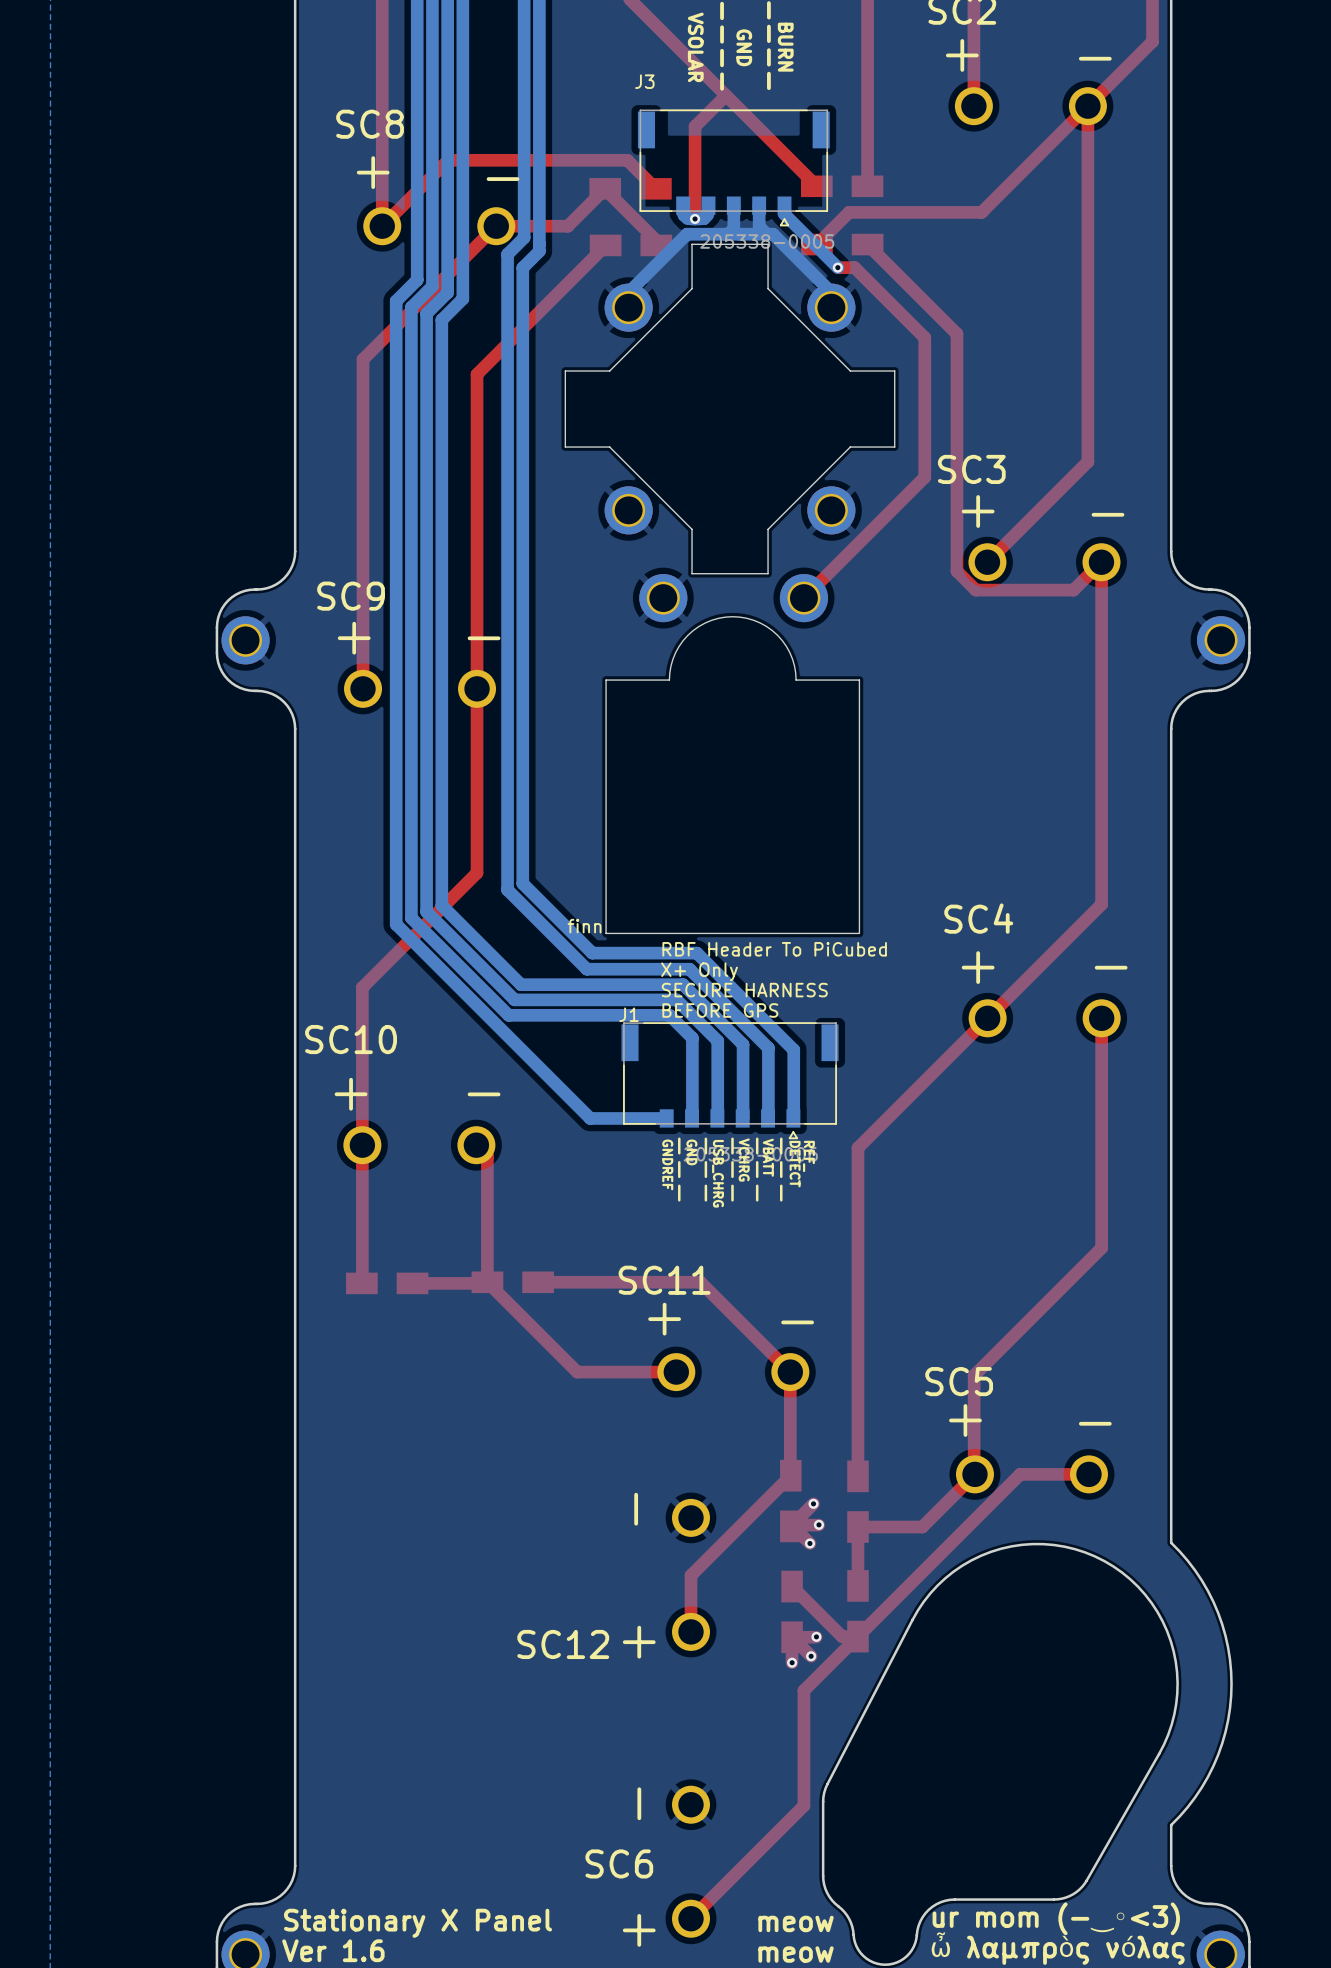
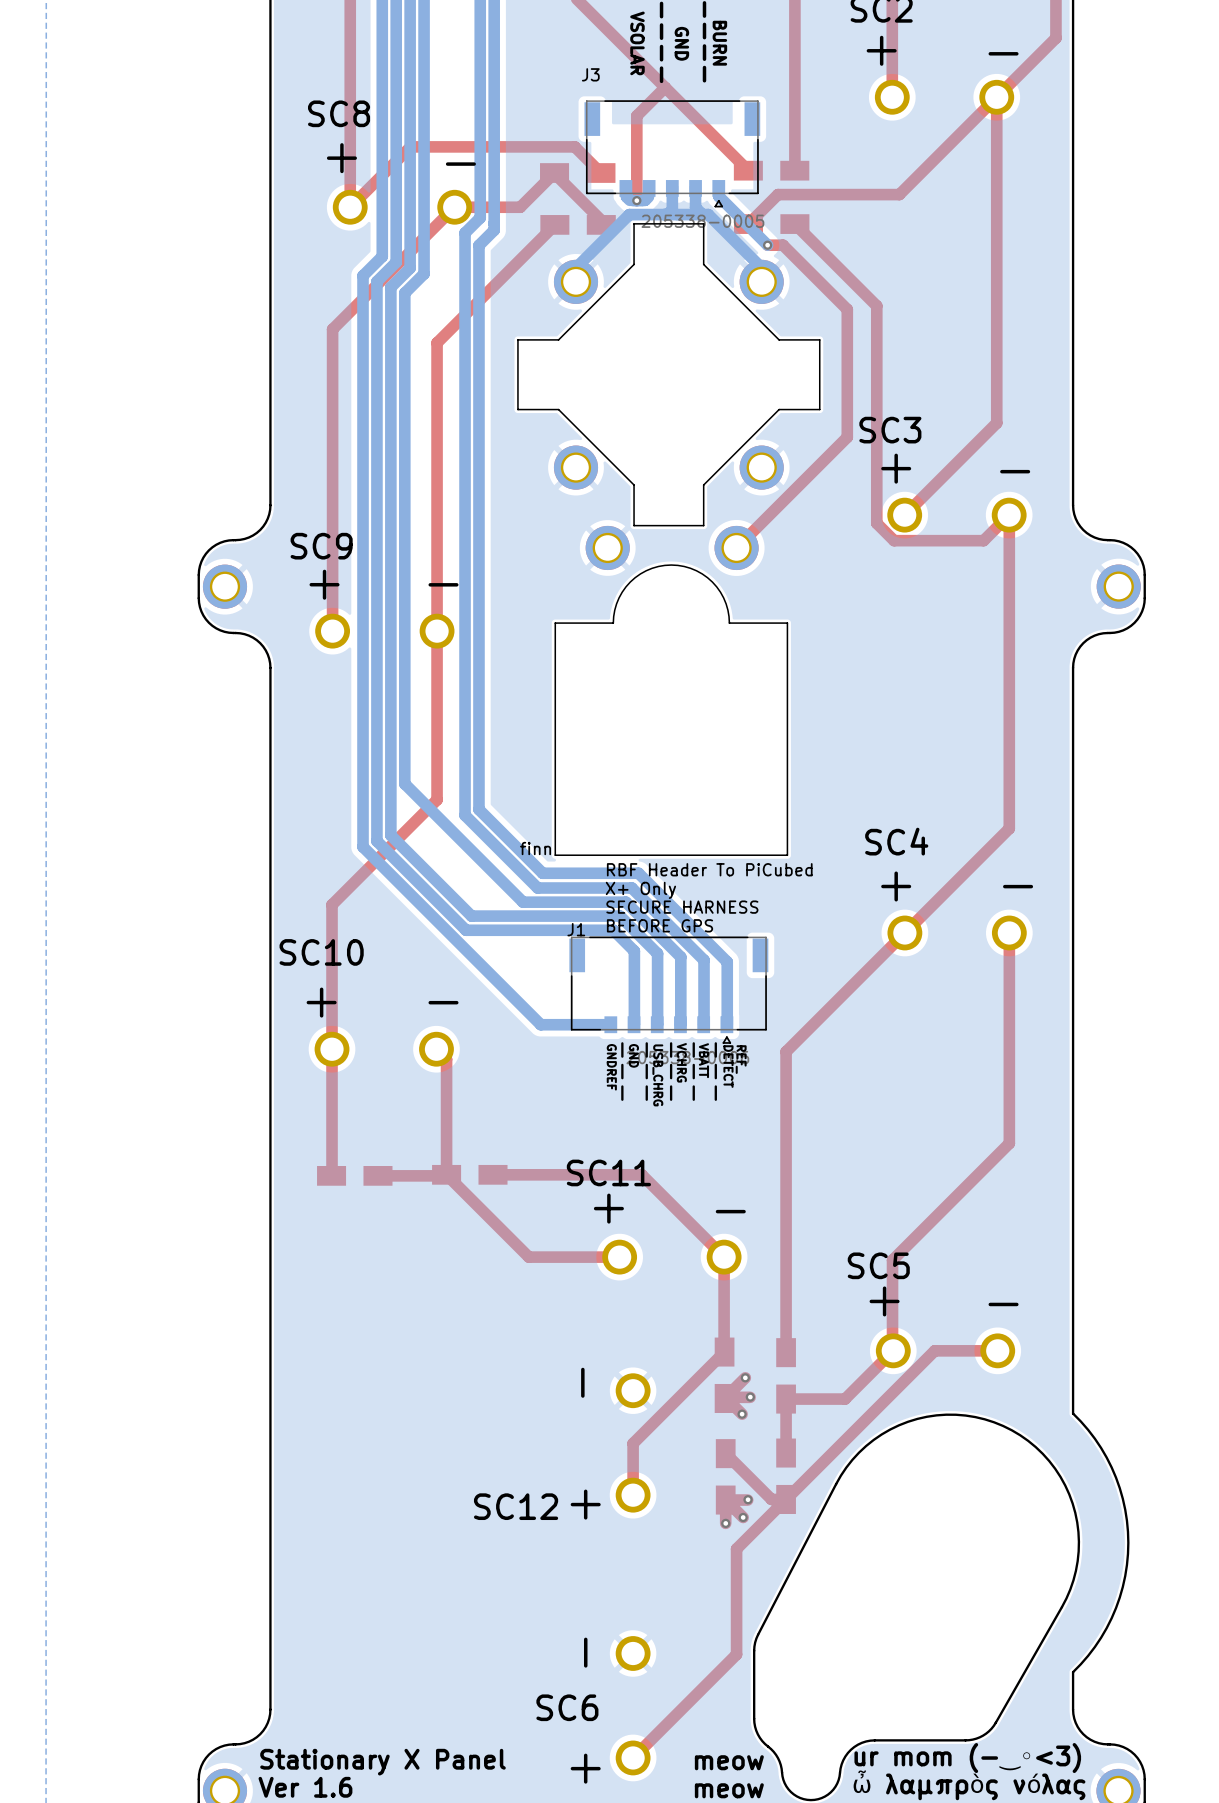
bottom track: (441, 855) (441, 905) (521, 984) (570, 984) -> (404, 783) (523, 902)

